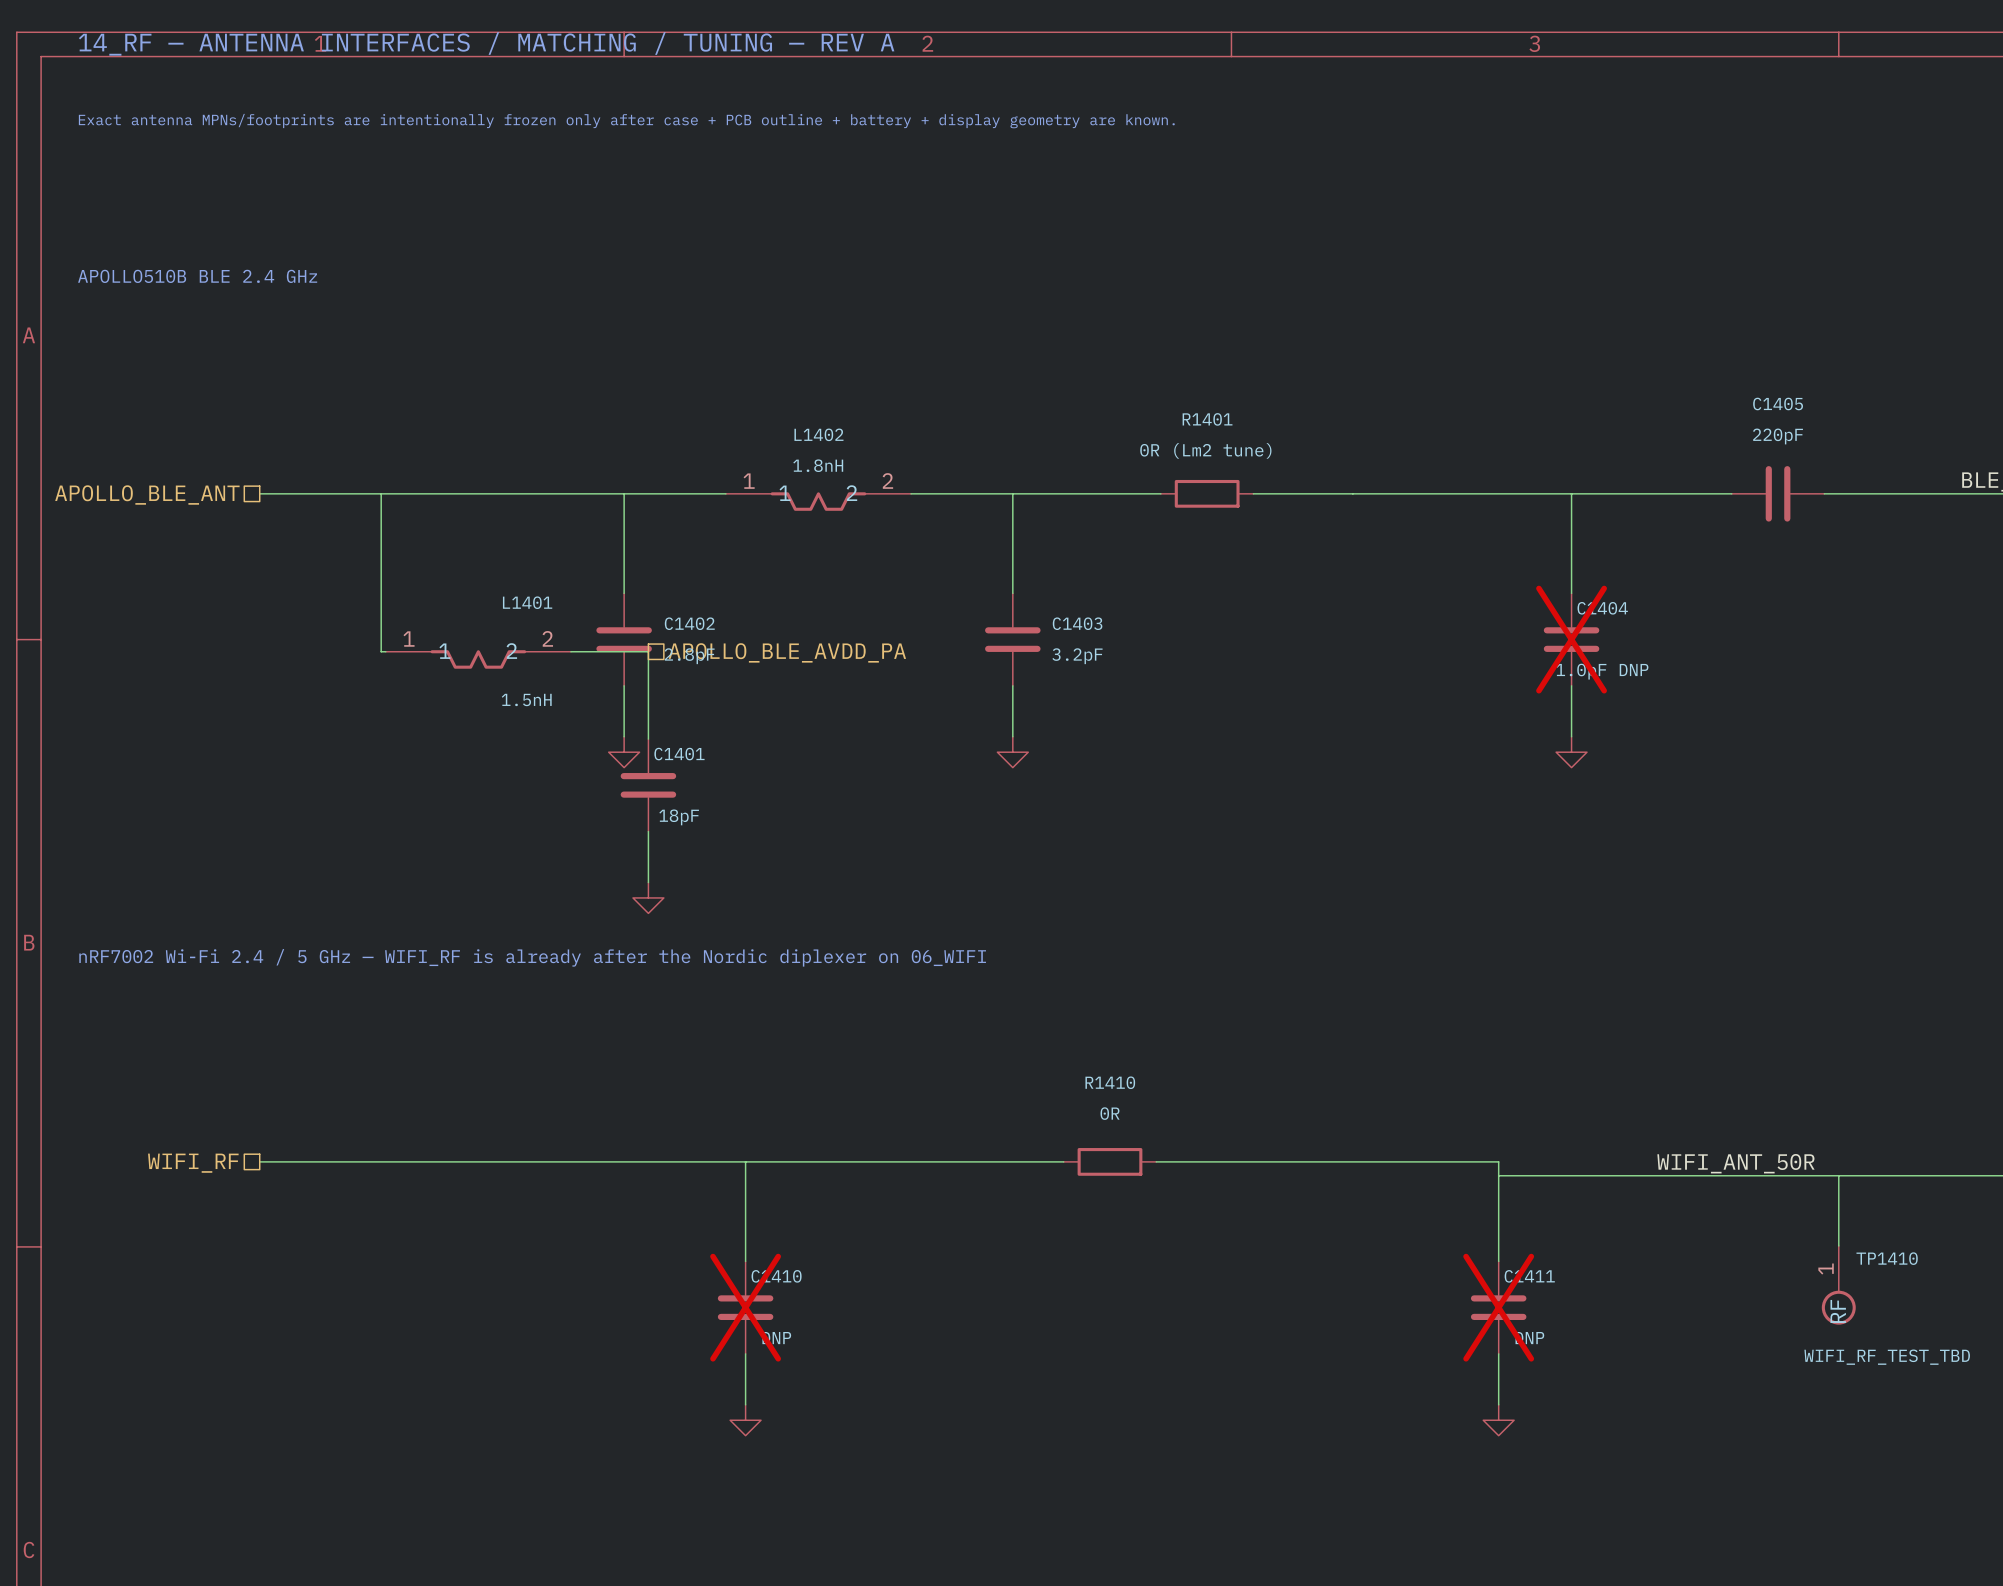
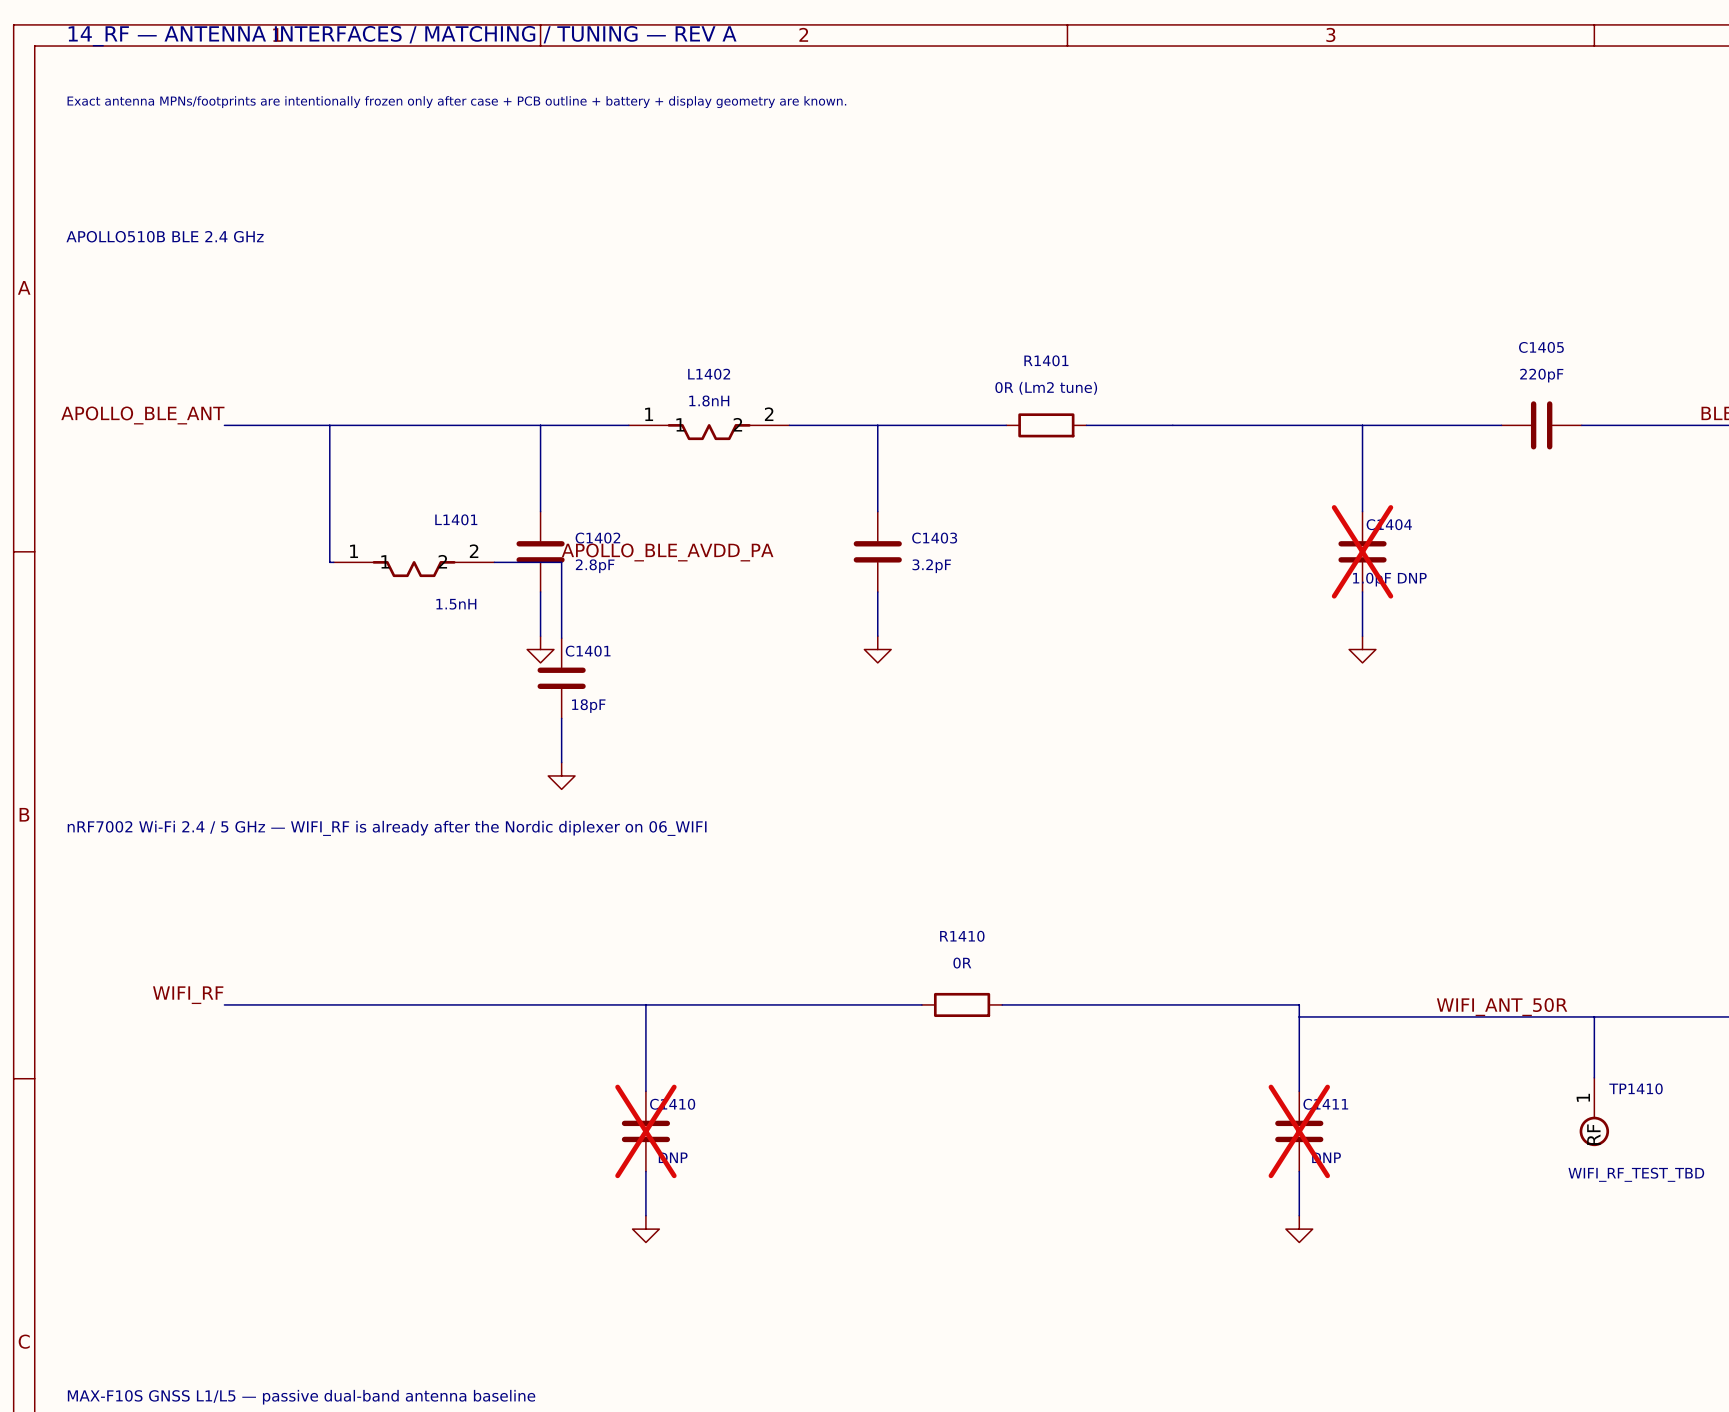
label: none -> APOLLO_BLE_ANT (142, 415)
hierarchical label: APOLLO_BLE_ANT (147, 495) -> none
label: none -> APOLLO_BLE_AVDD_PA (667, 552)
hierarchical label: APOLLO_BLE_AVDD_PA (787, 652) -> none
label: none -> WIFI_RF (188, 995)
hierarchical label: WIFI_RF (193, 1163) -> none

